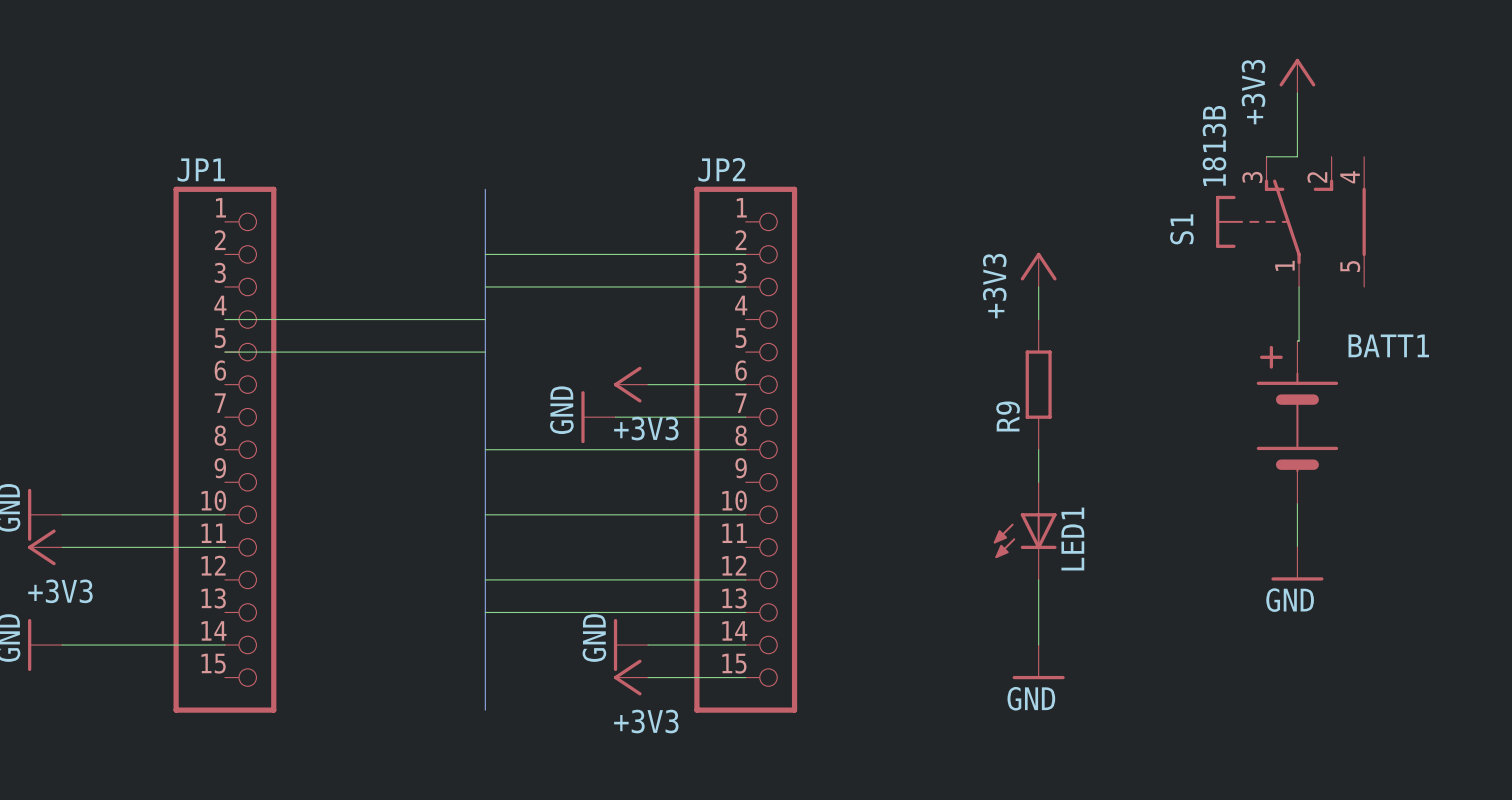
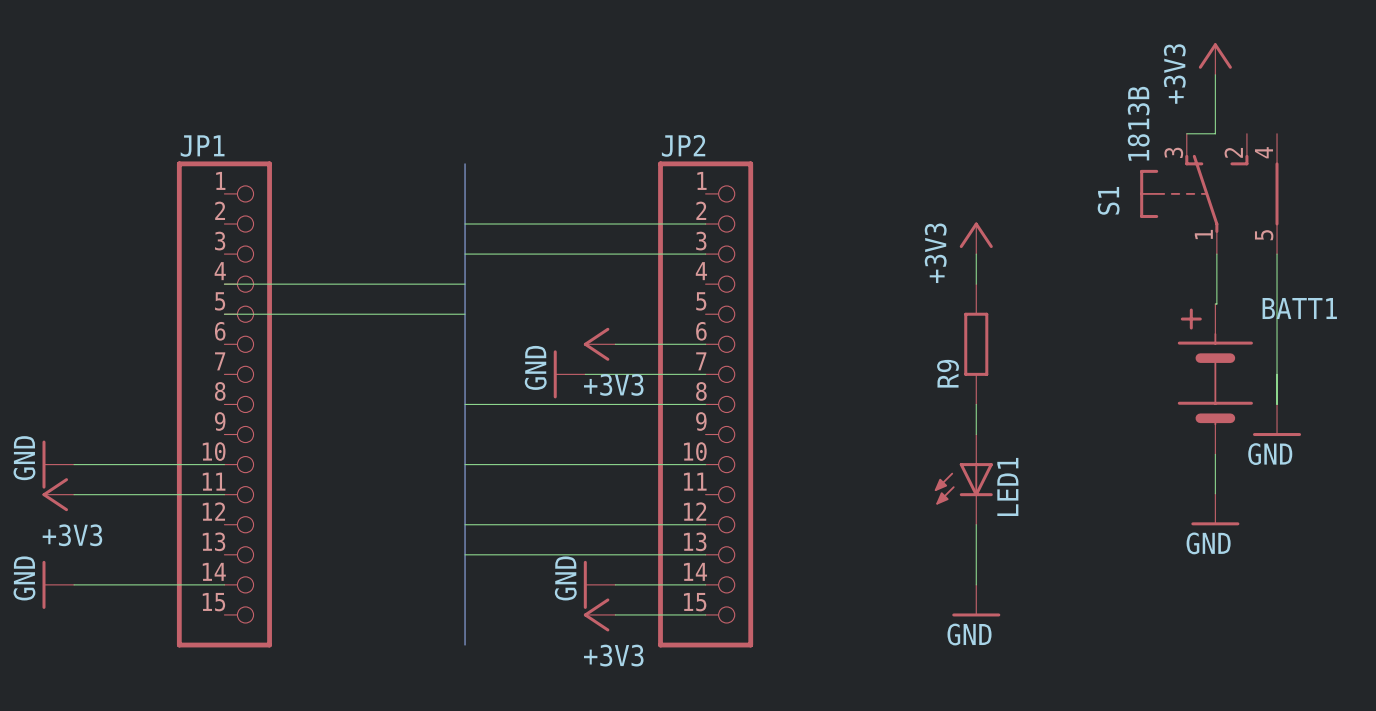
wire: none -> (1277, 254) (1277, 404)
power symbol: none -> GND (1277, 420)

